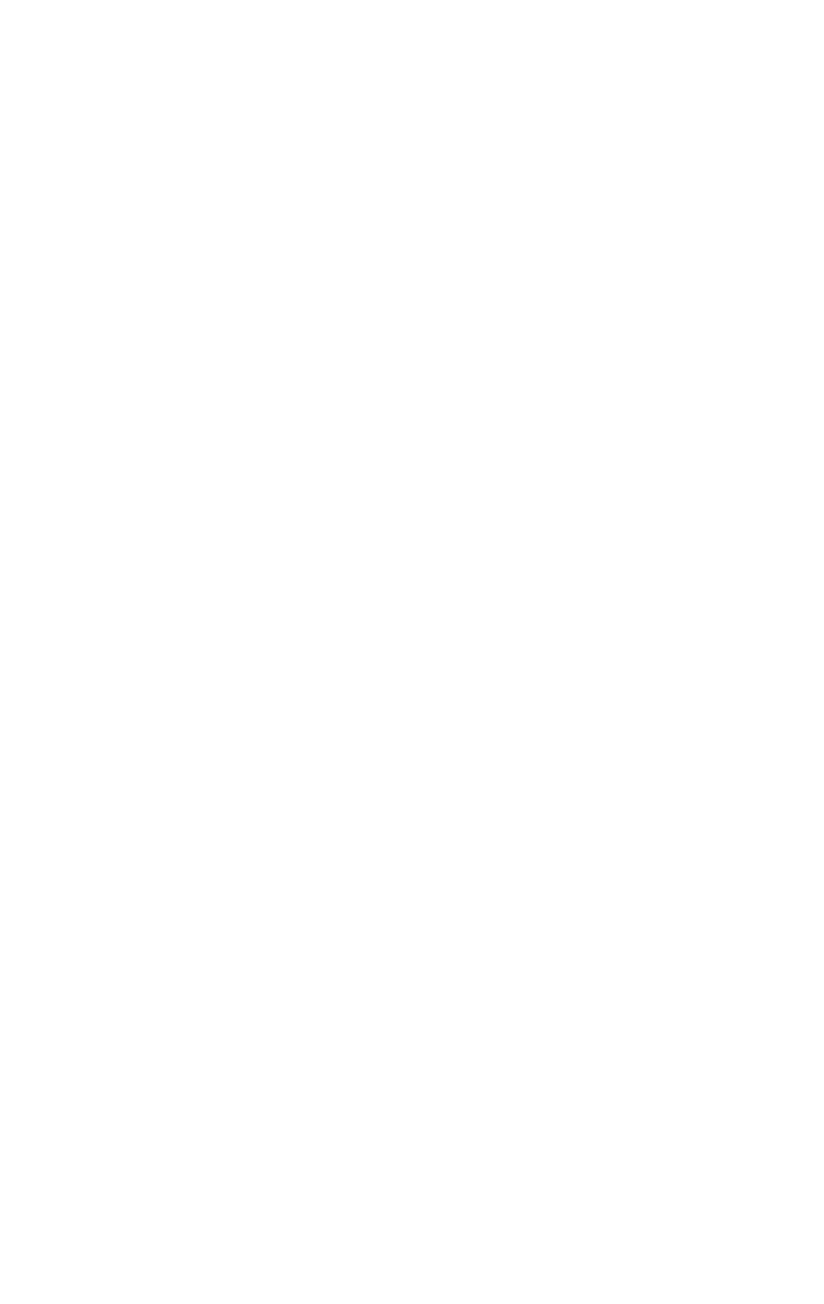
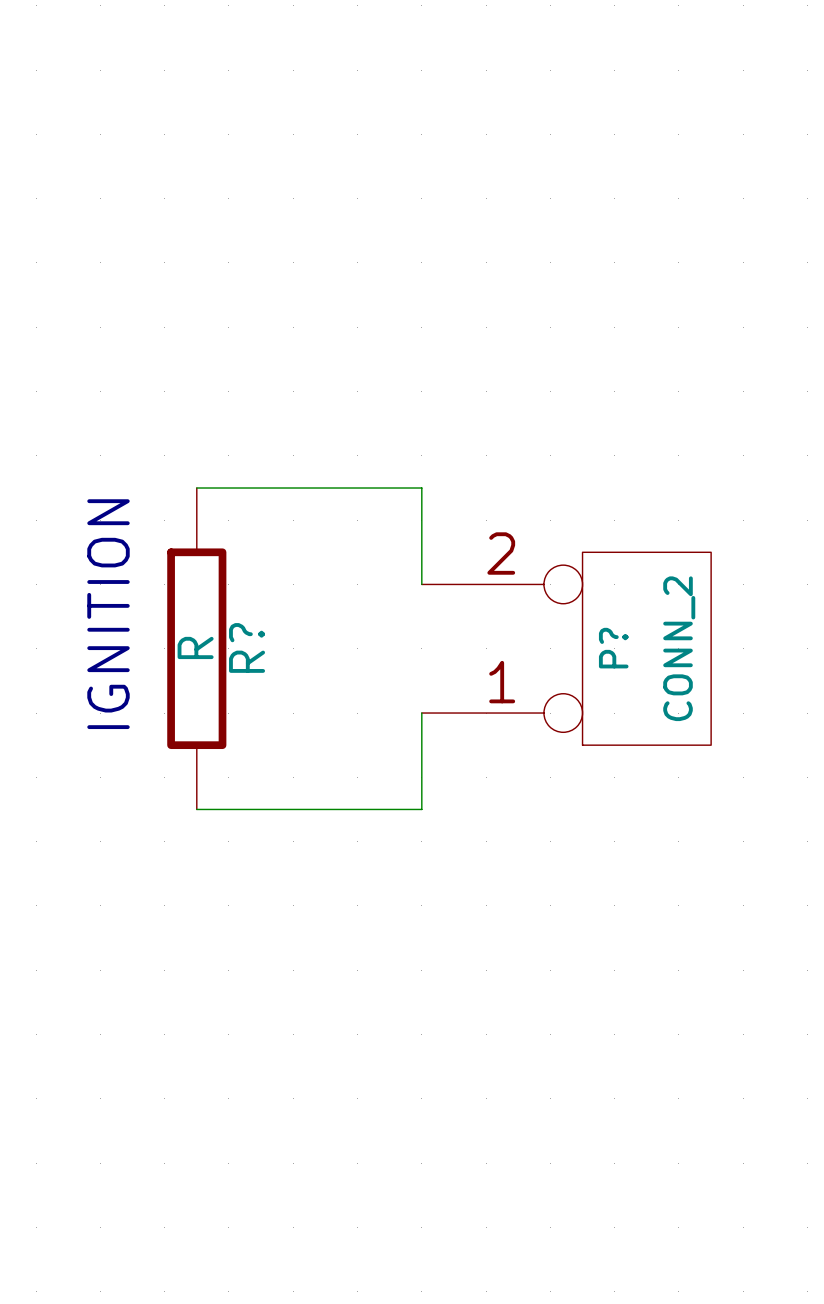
wire: none -> (196, 488) (421, 488) (421, 584)
text: none -> IGNITION (108, 614)
R?: none -> R (196, 648)
P?: none -> CONN_2 (566, 648)
wire: none -> (421, 713) (421, 809) (196, 809)

